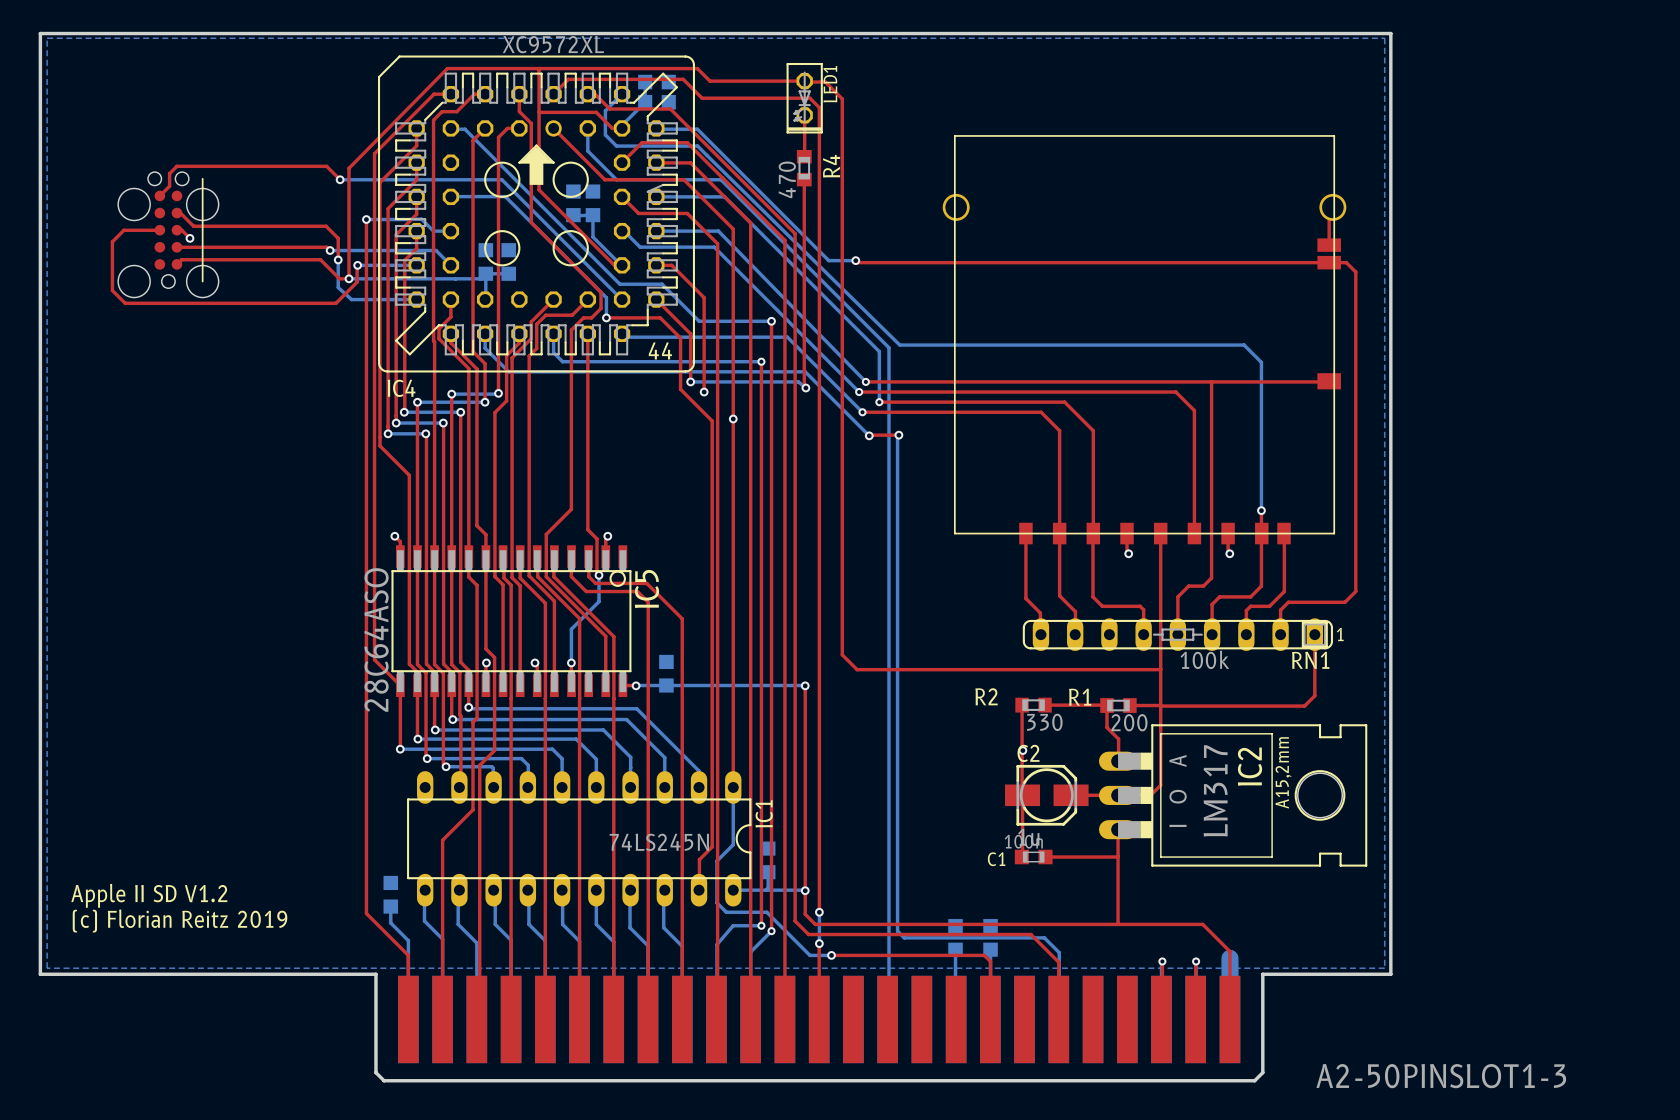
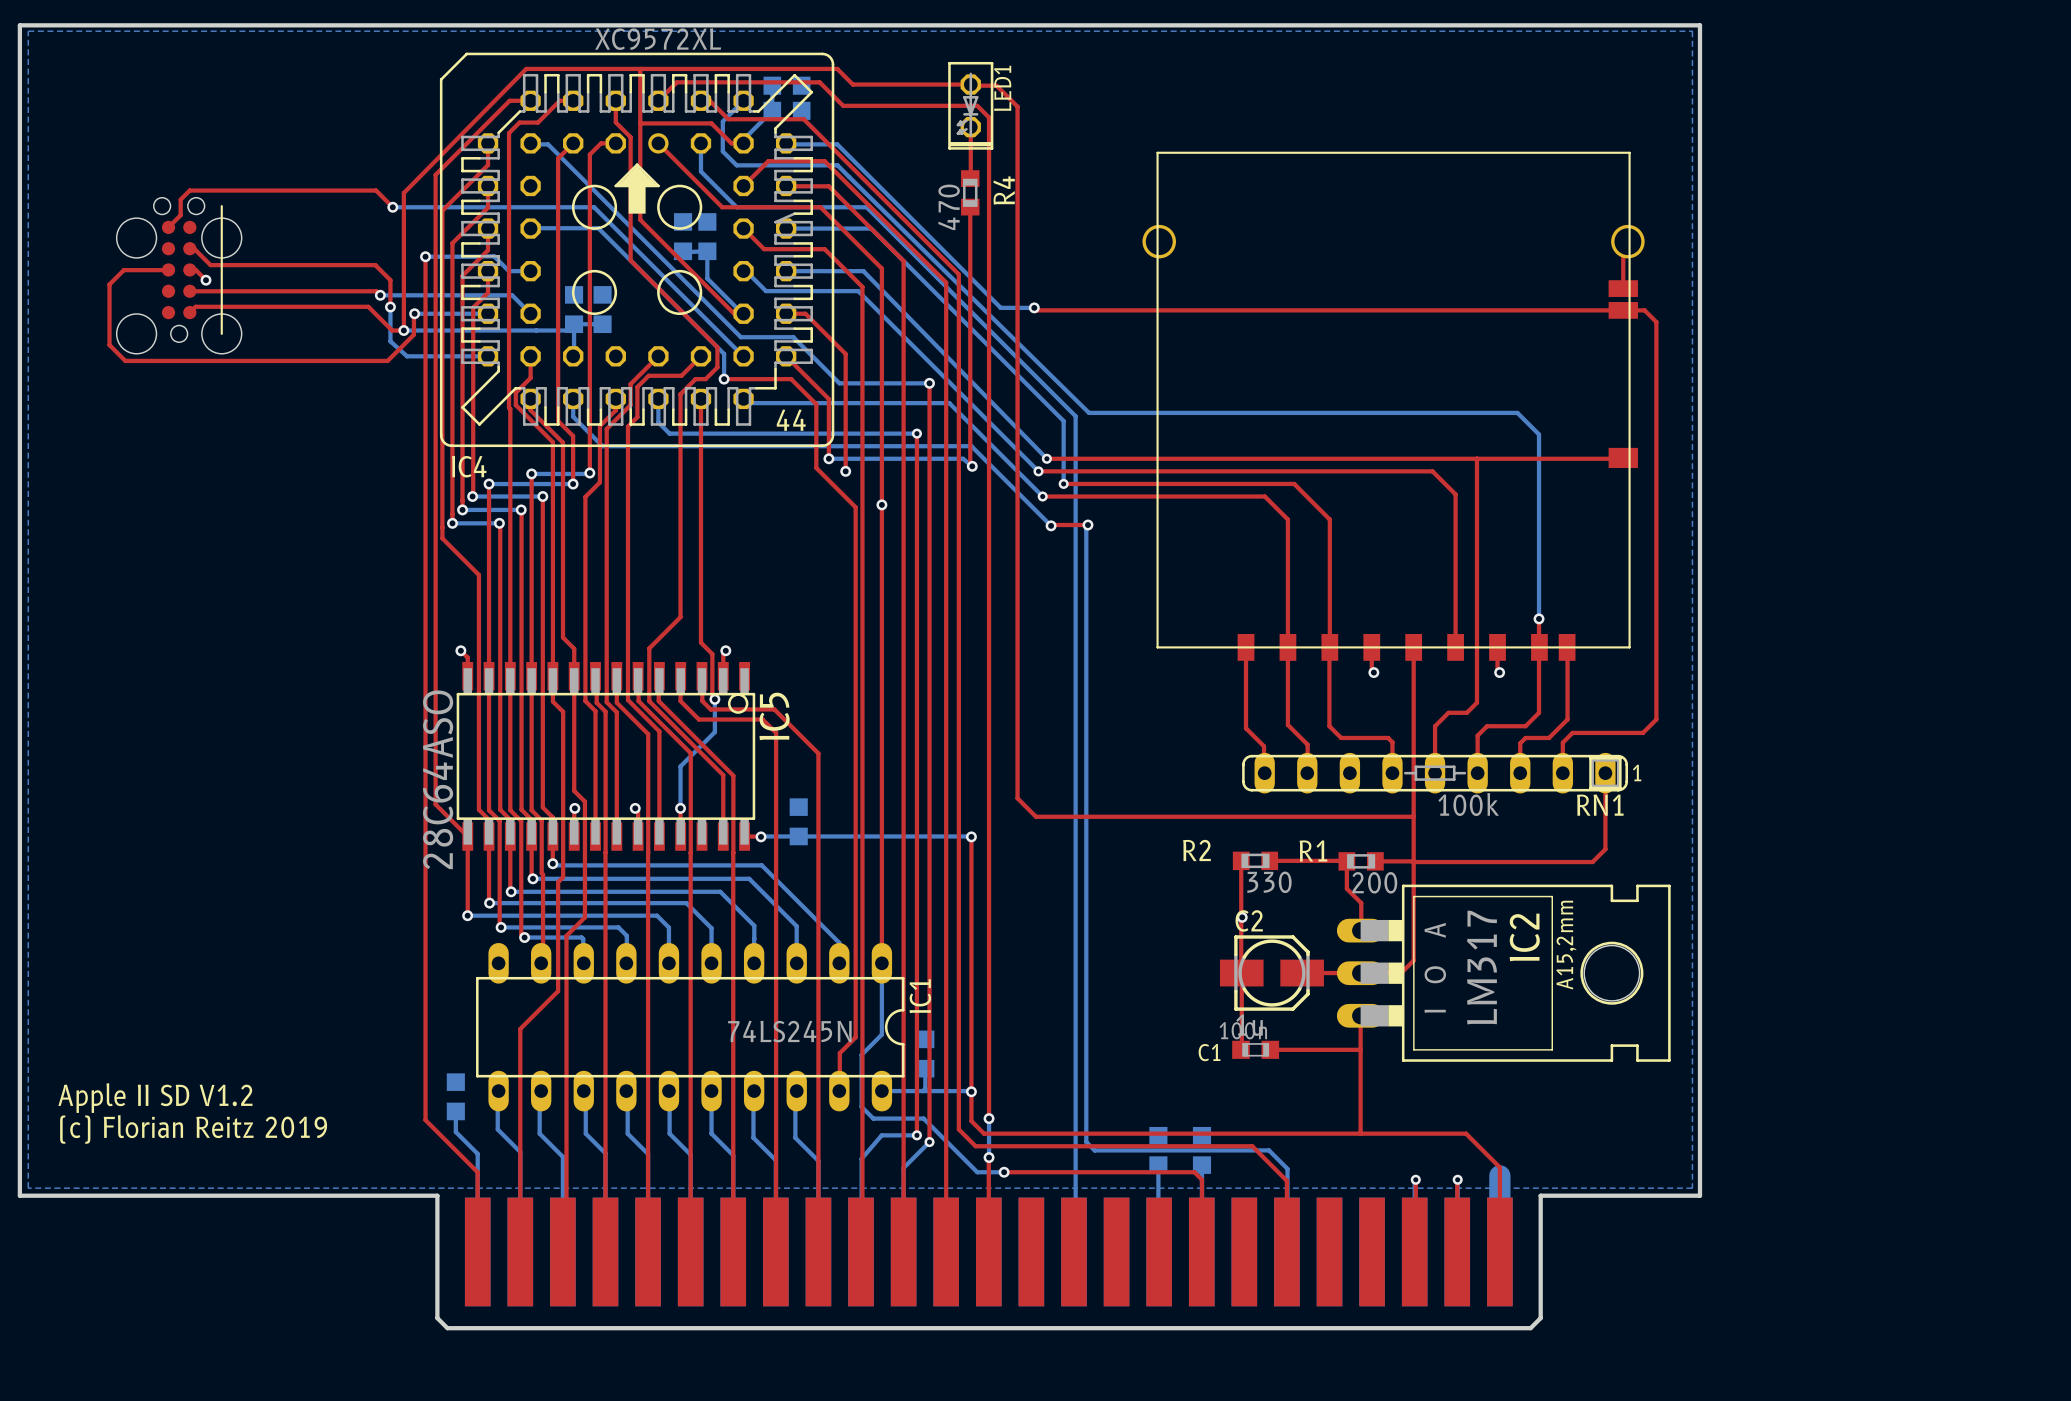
part value: A2-50PINSLOT1-3 (1441, 1076) -> none

